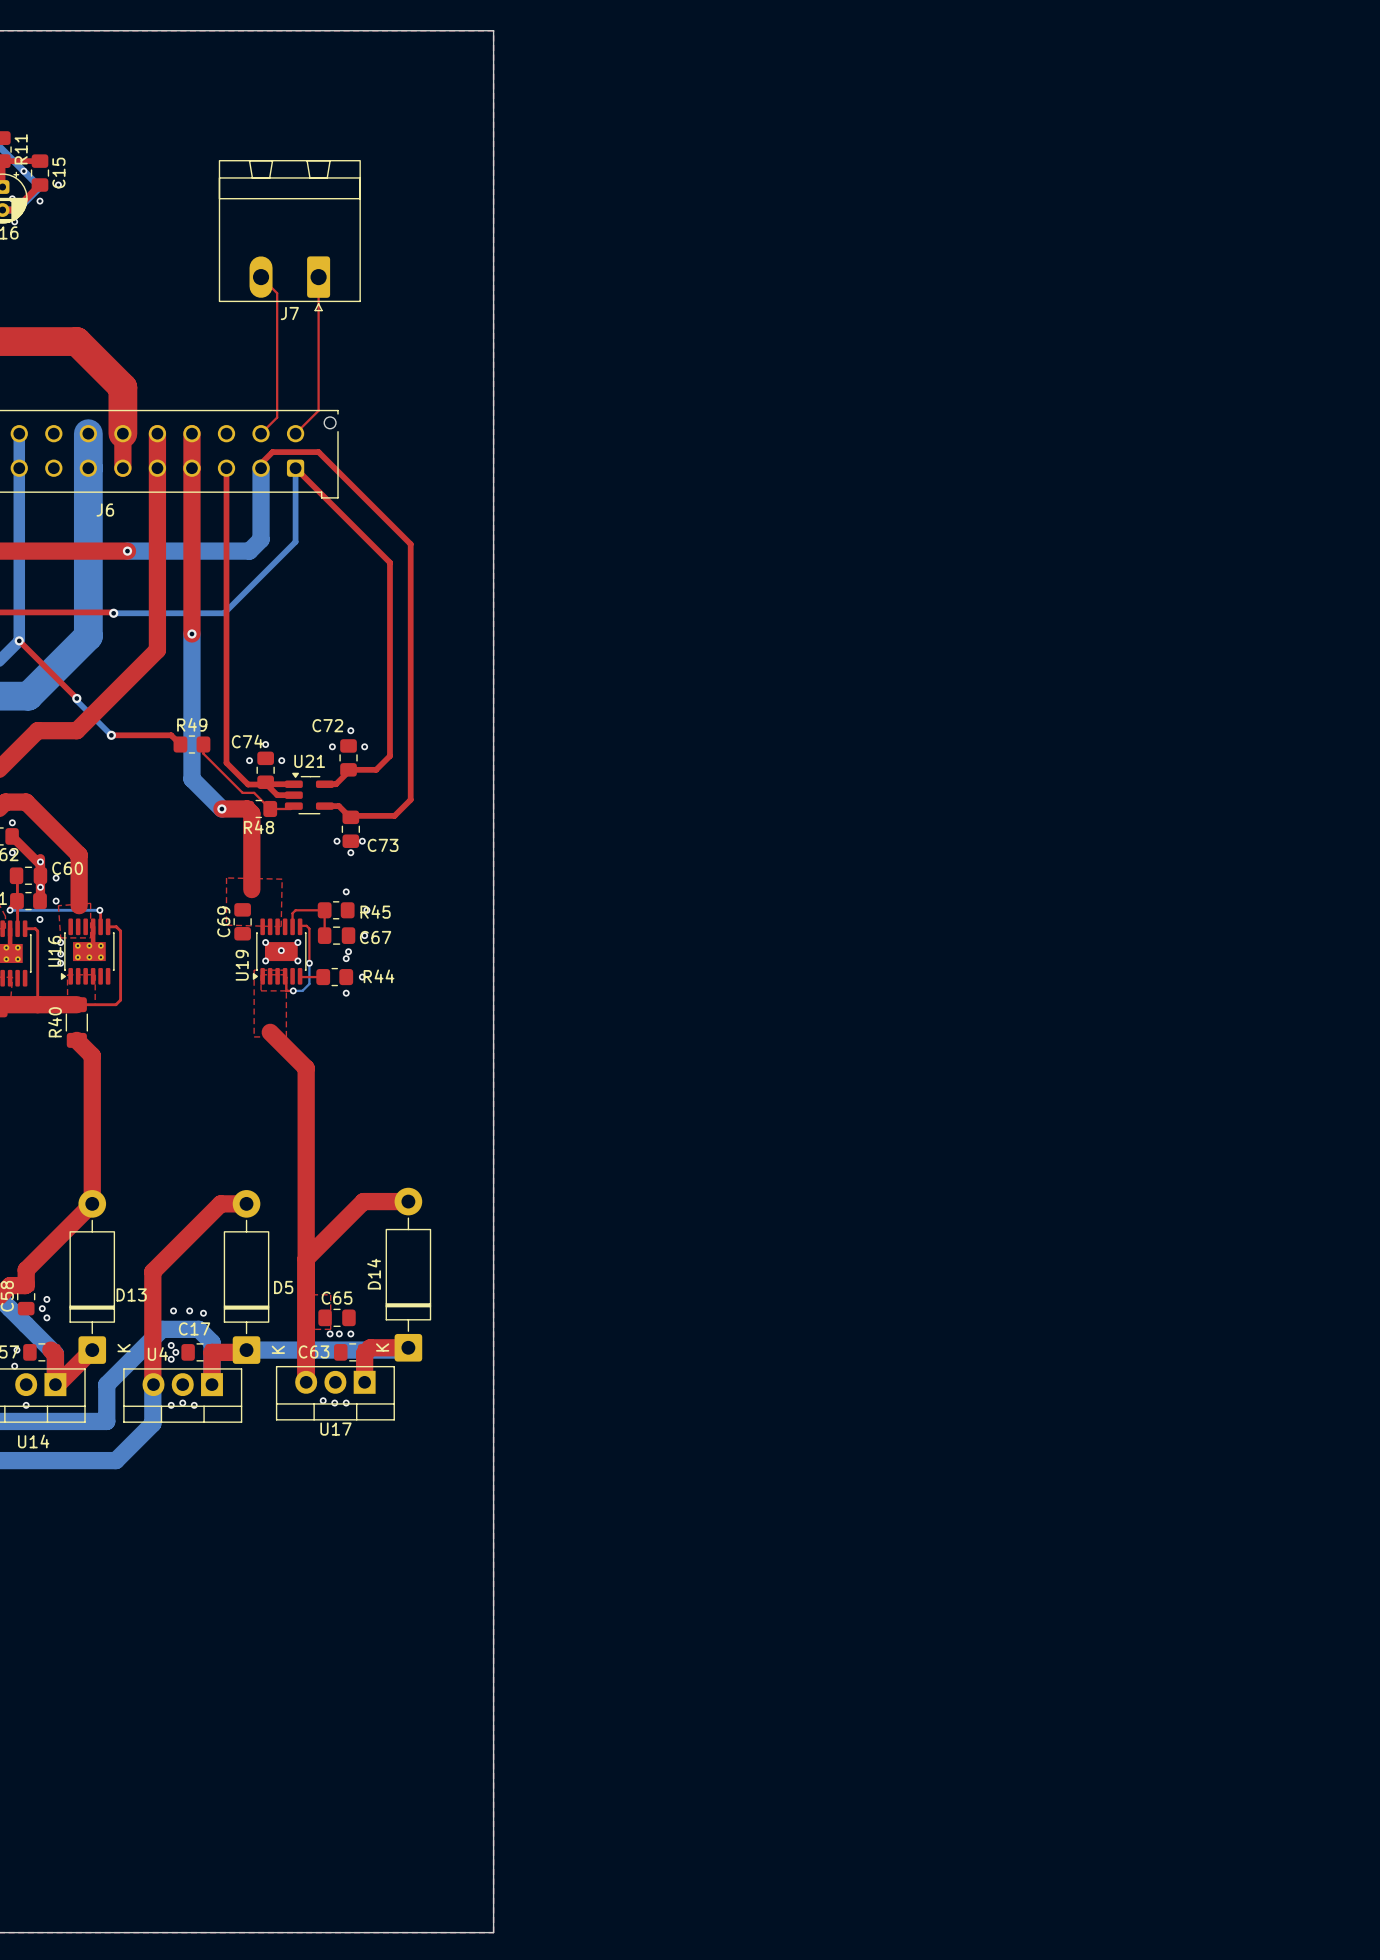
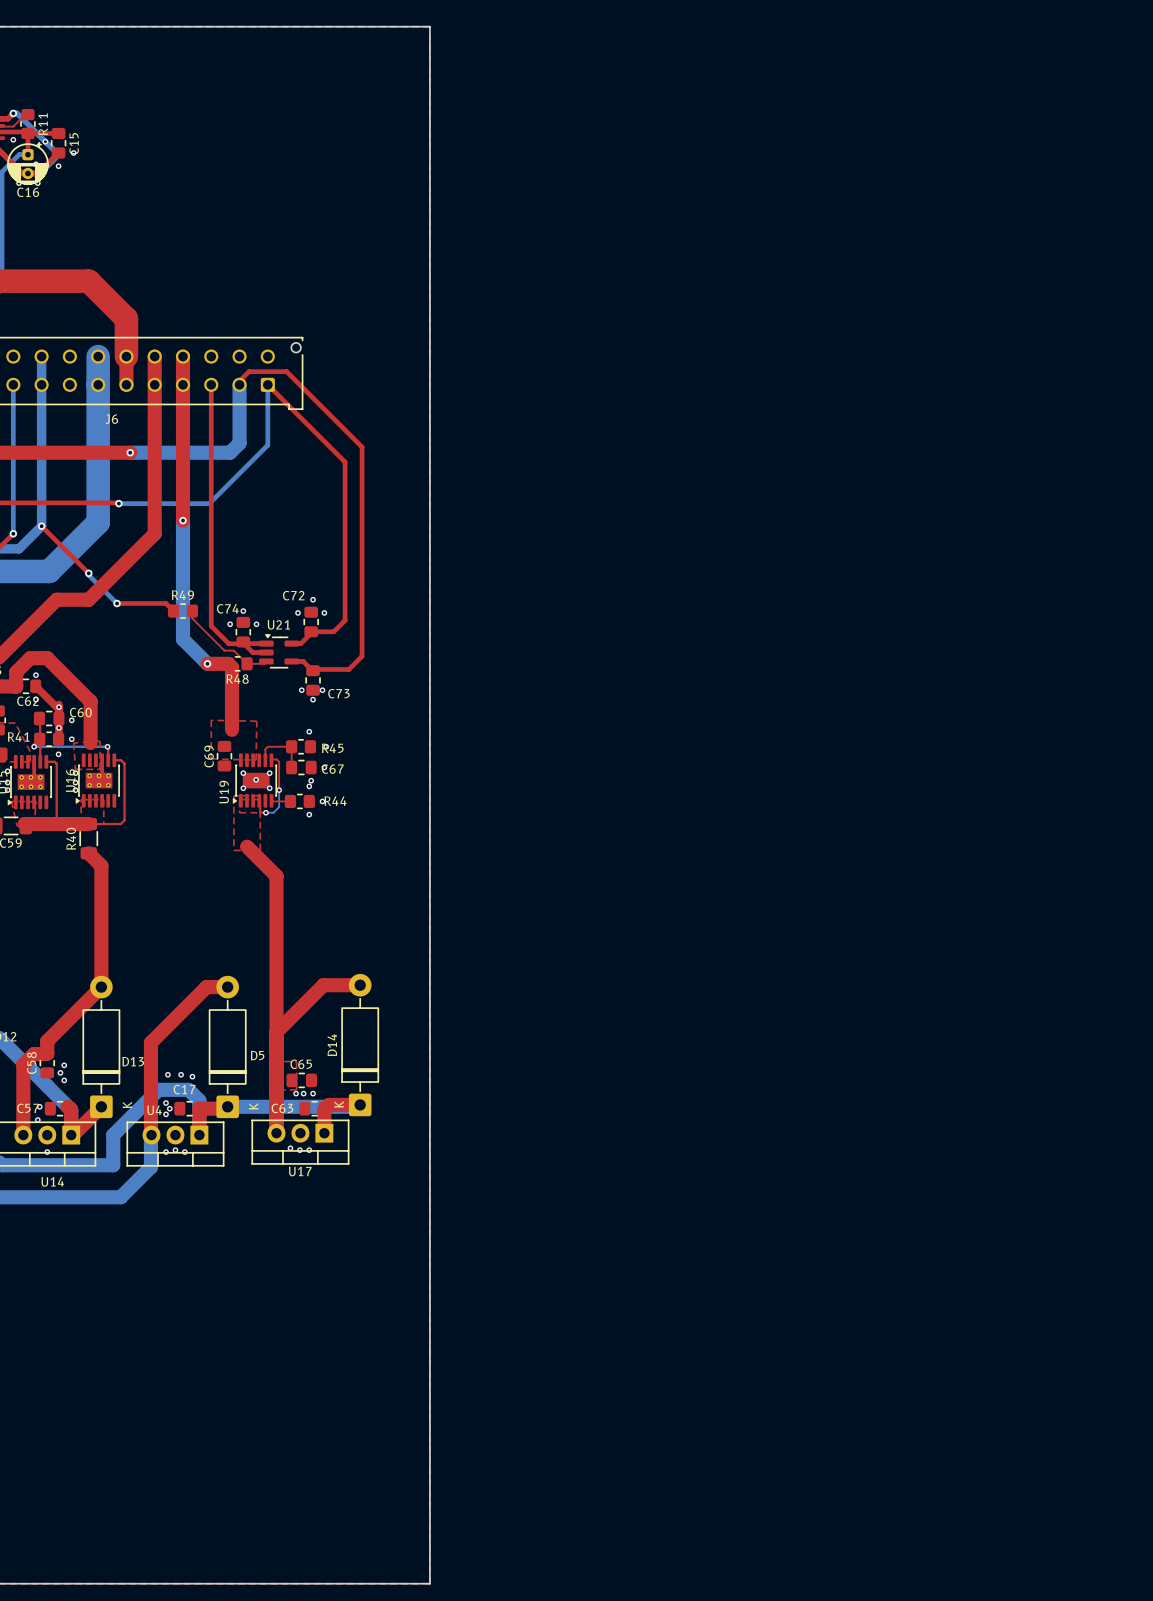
J7: (289, 235) -> none
top track: (261, 277) (277, 293) (277, 417) (261, 433) -> none
top track: (318, 277) (318, 410) (295, 433) -> none

